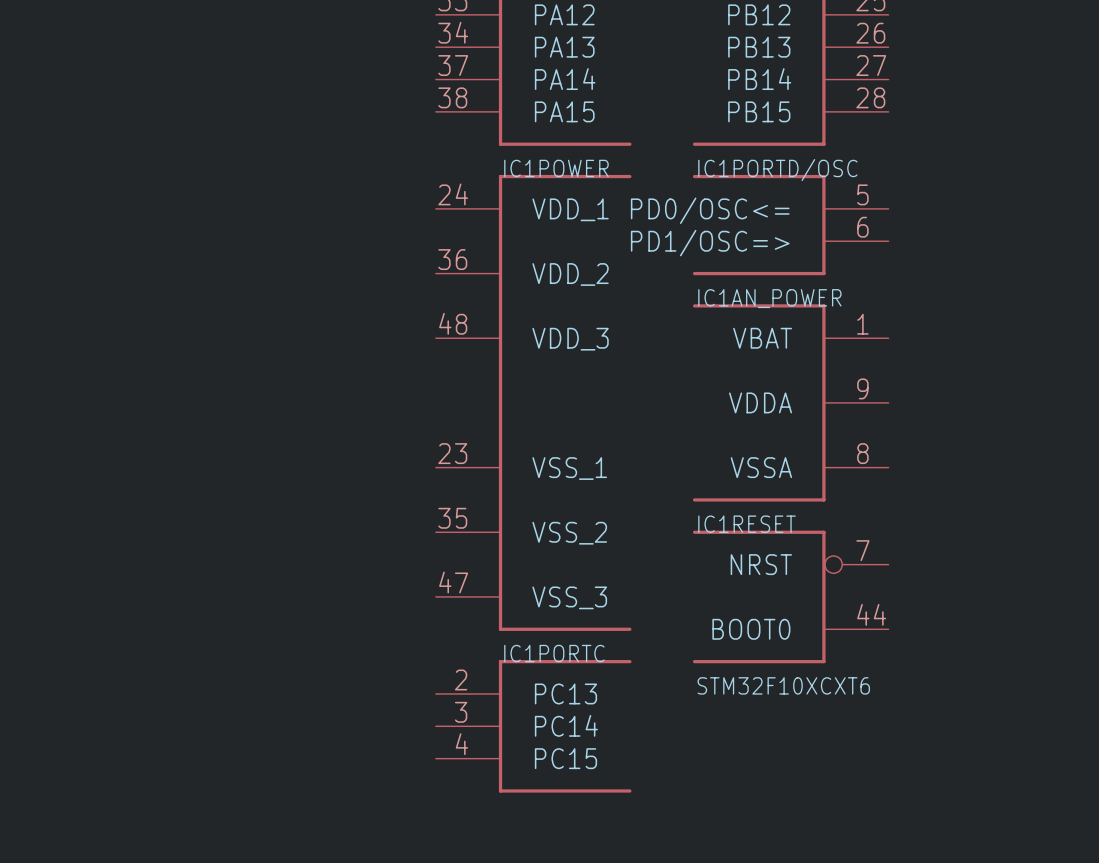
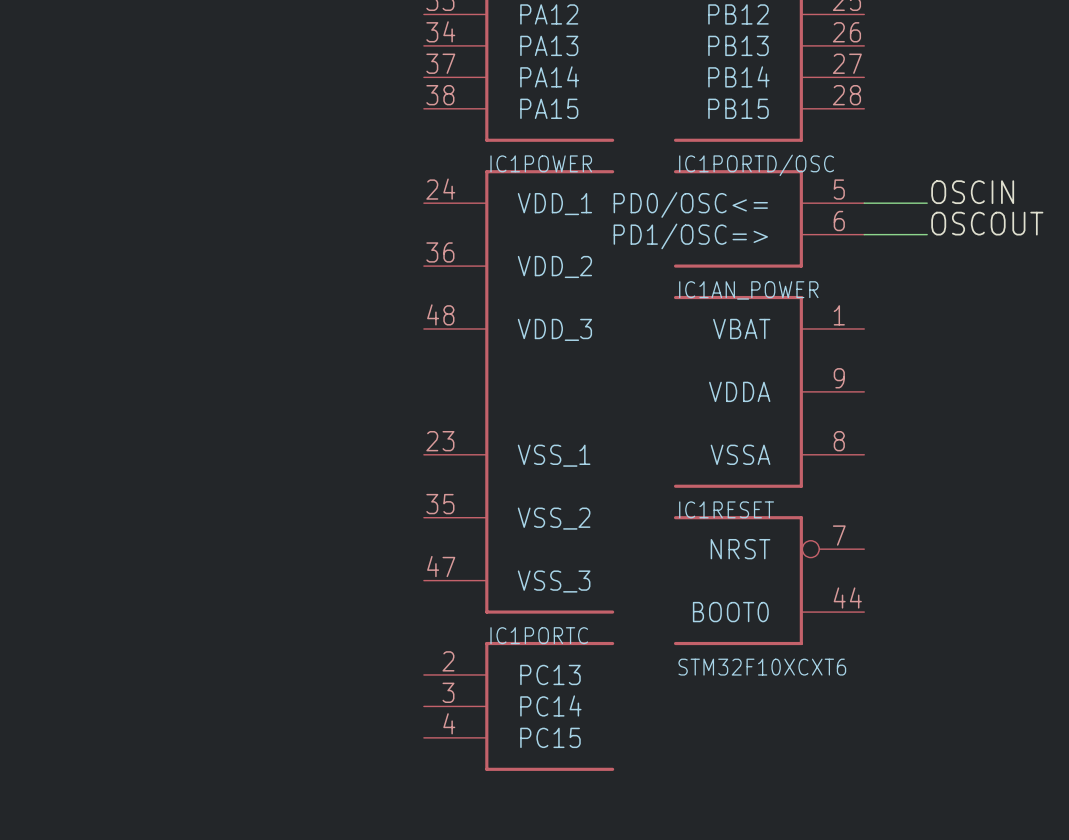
label: none -> OSCIN (972, 192)
wire: none -> (864, 203) (927, 203)
label: none -> OSCOUT (987, 223)
wire: none -> (864, 234) (927, 234)

